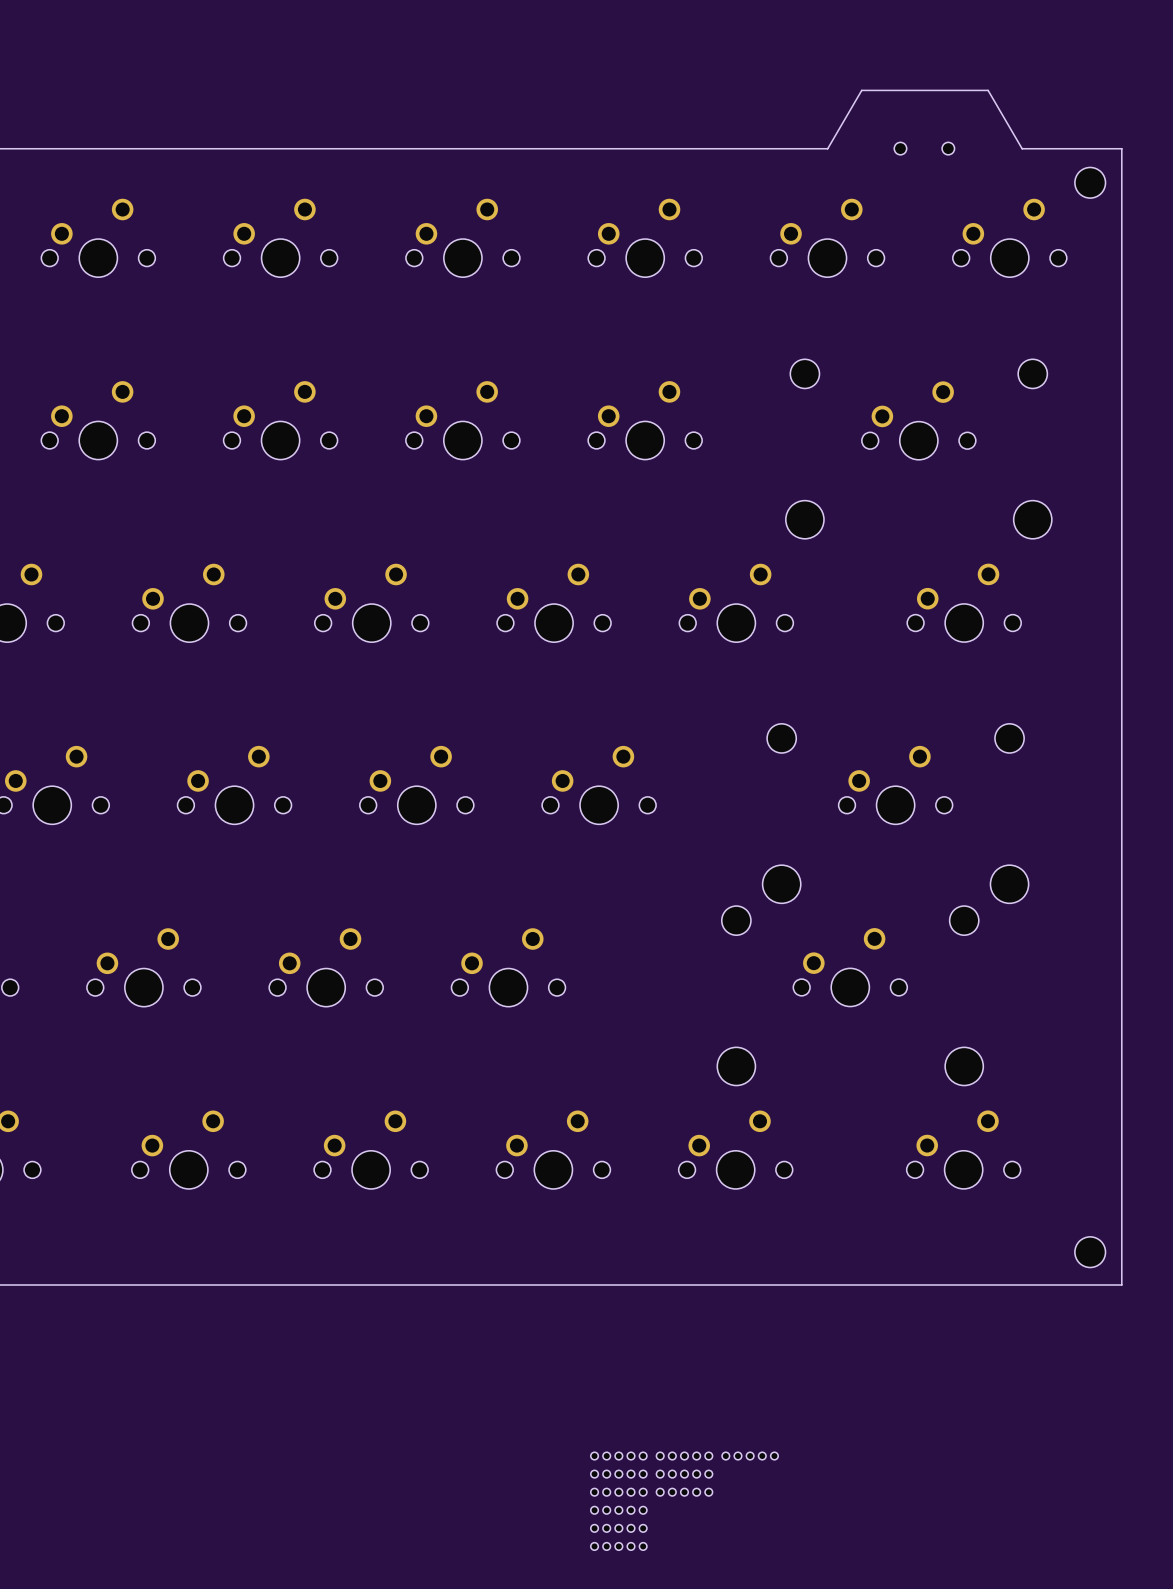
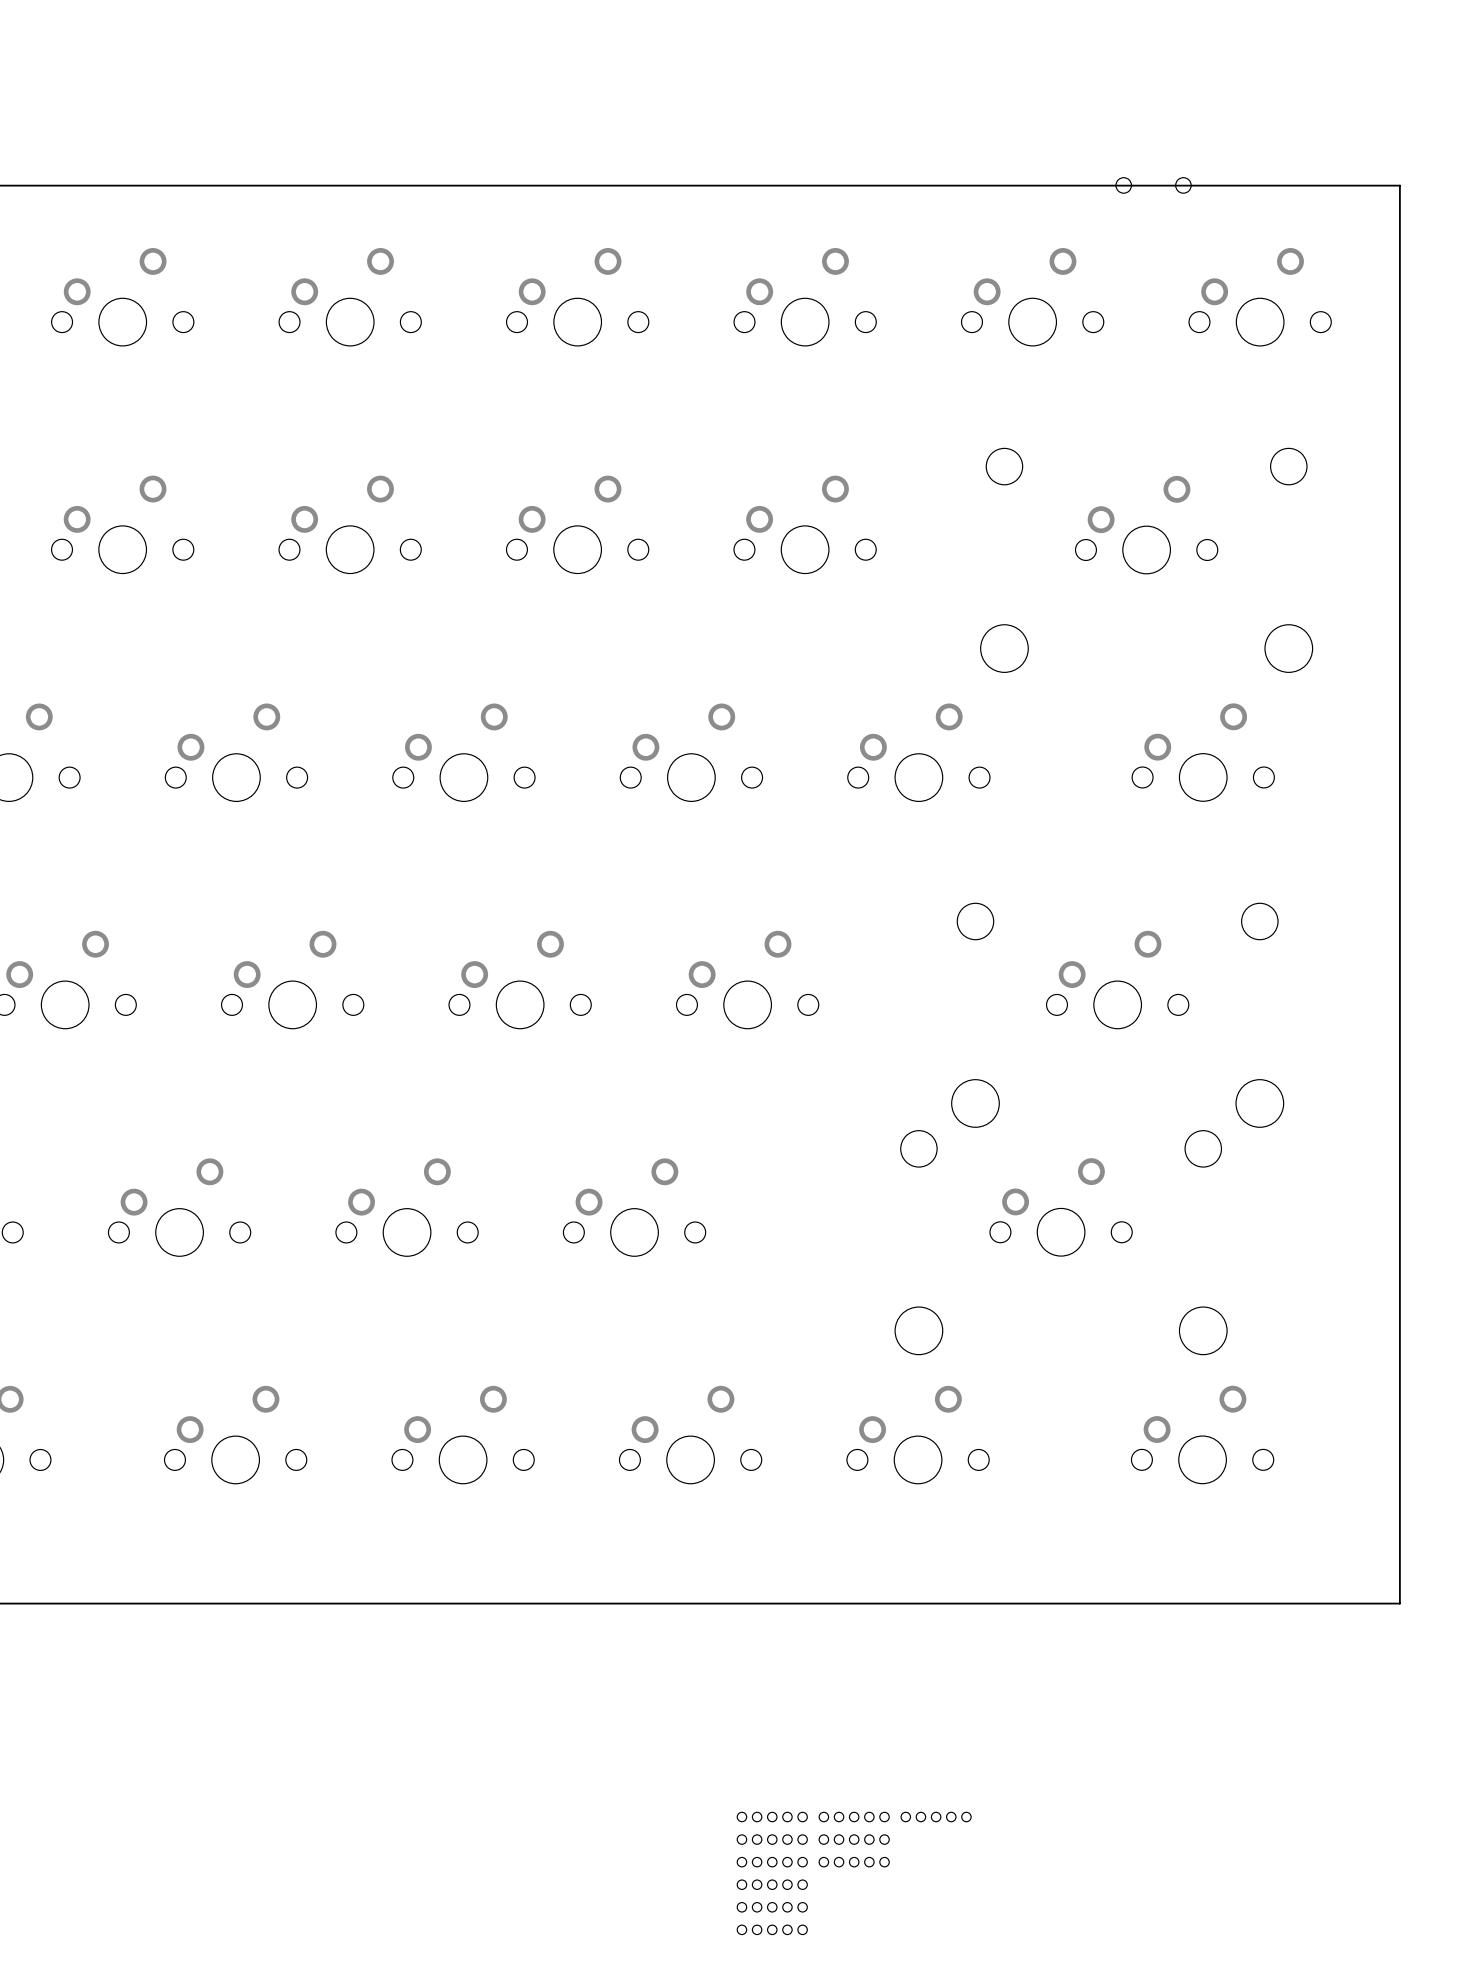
board edge: (827, 148) (861, 90) (988, 90) (1022, 148) -> (1032, 185) (1275, 185)
part: (1090, 182) -> none
part: (1090, 1252) -> none

